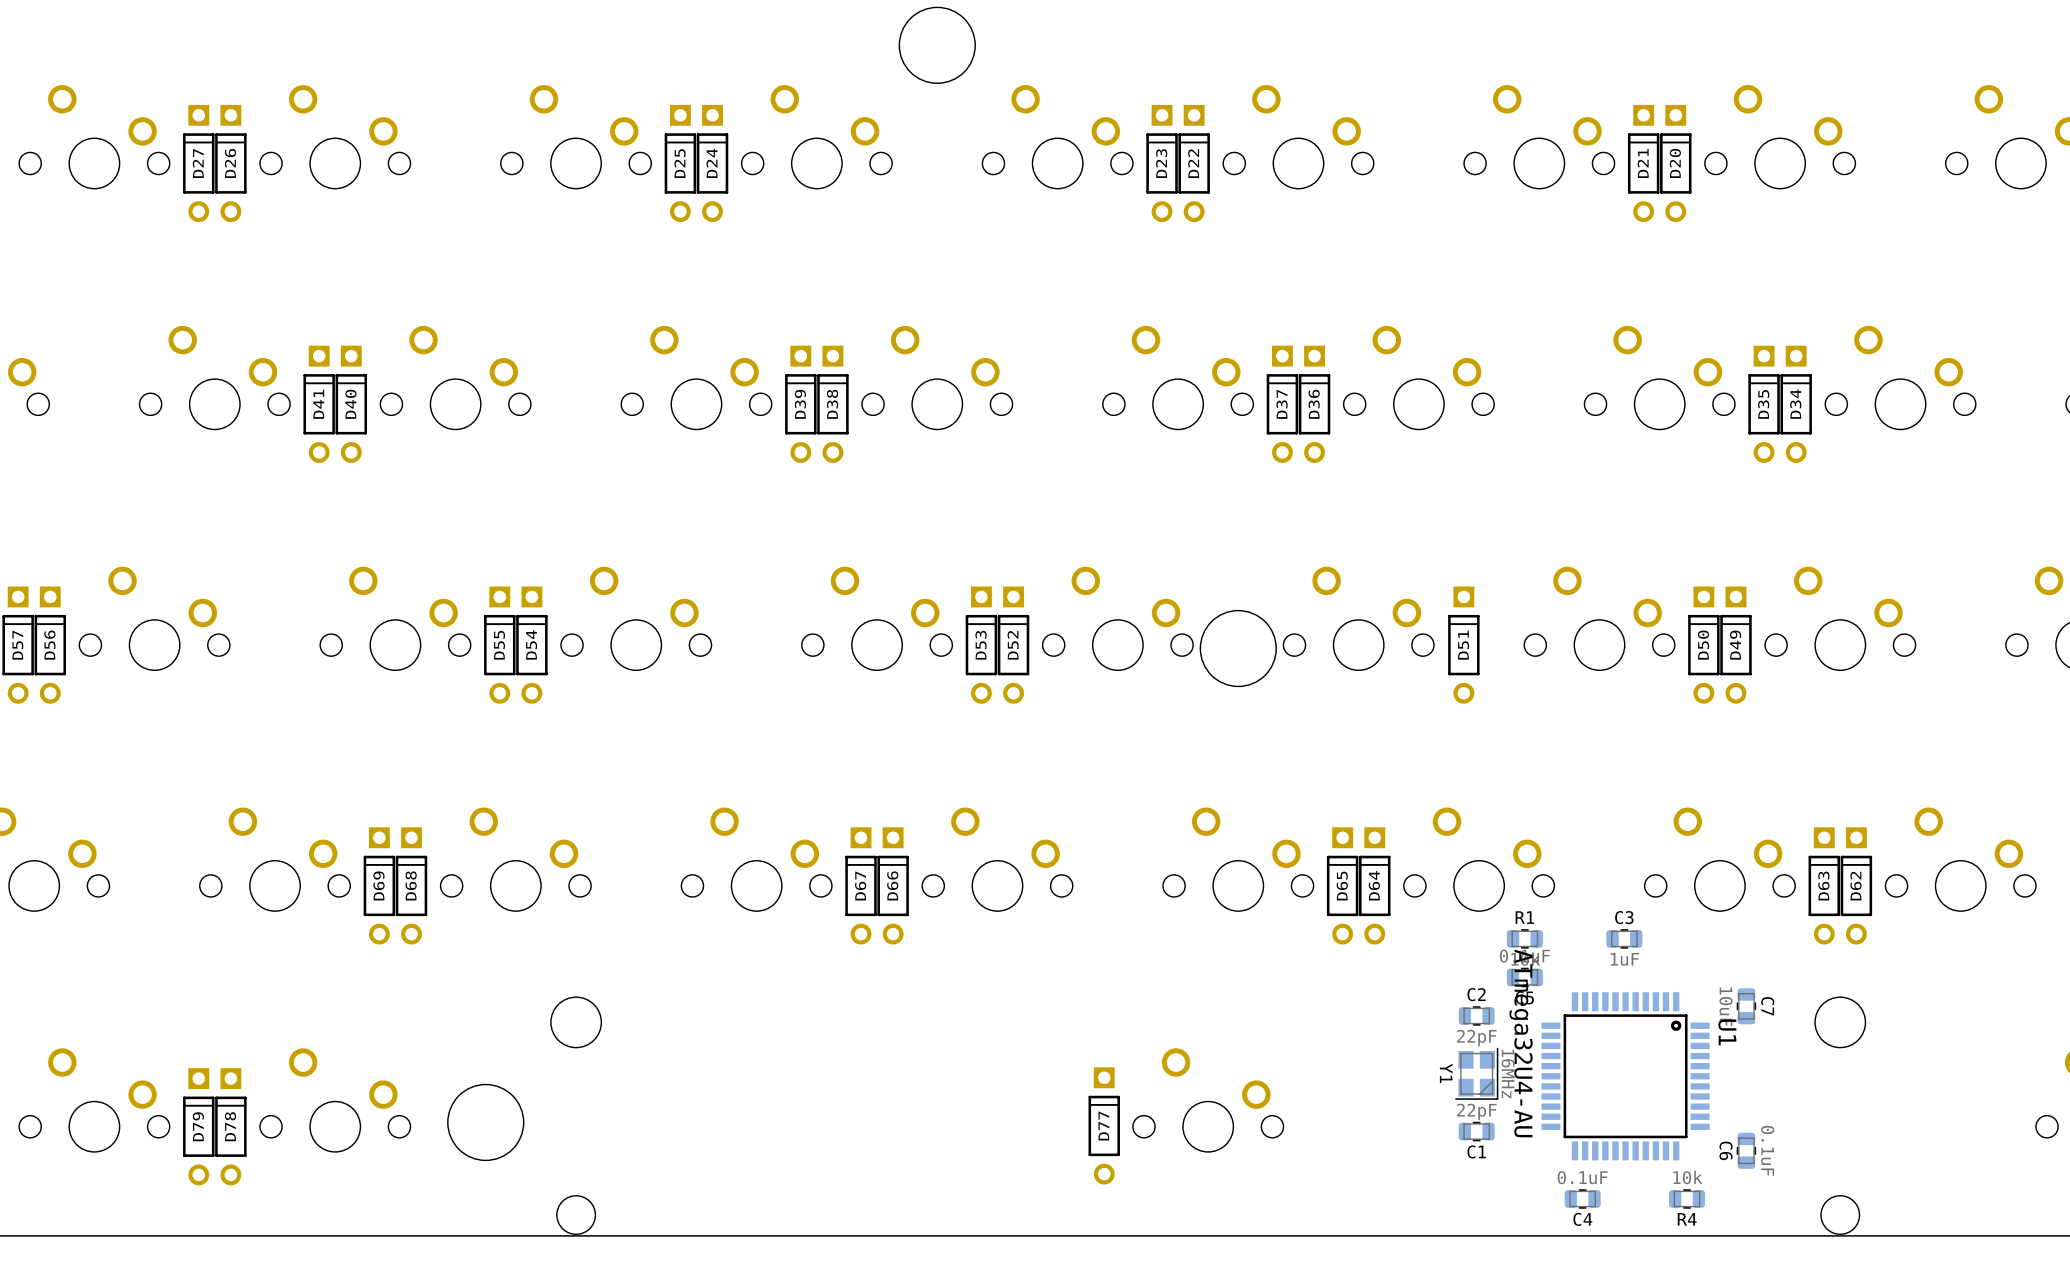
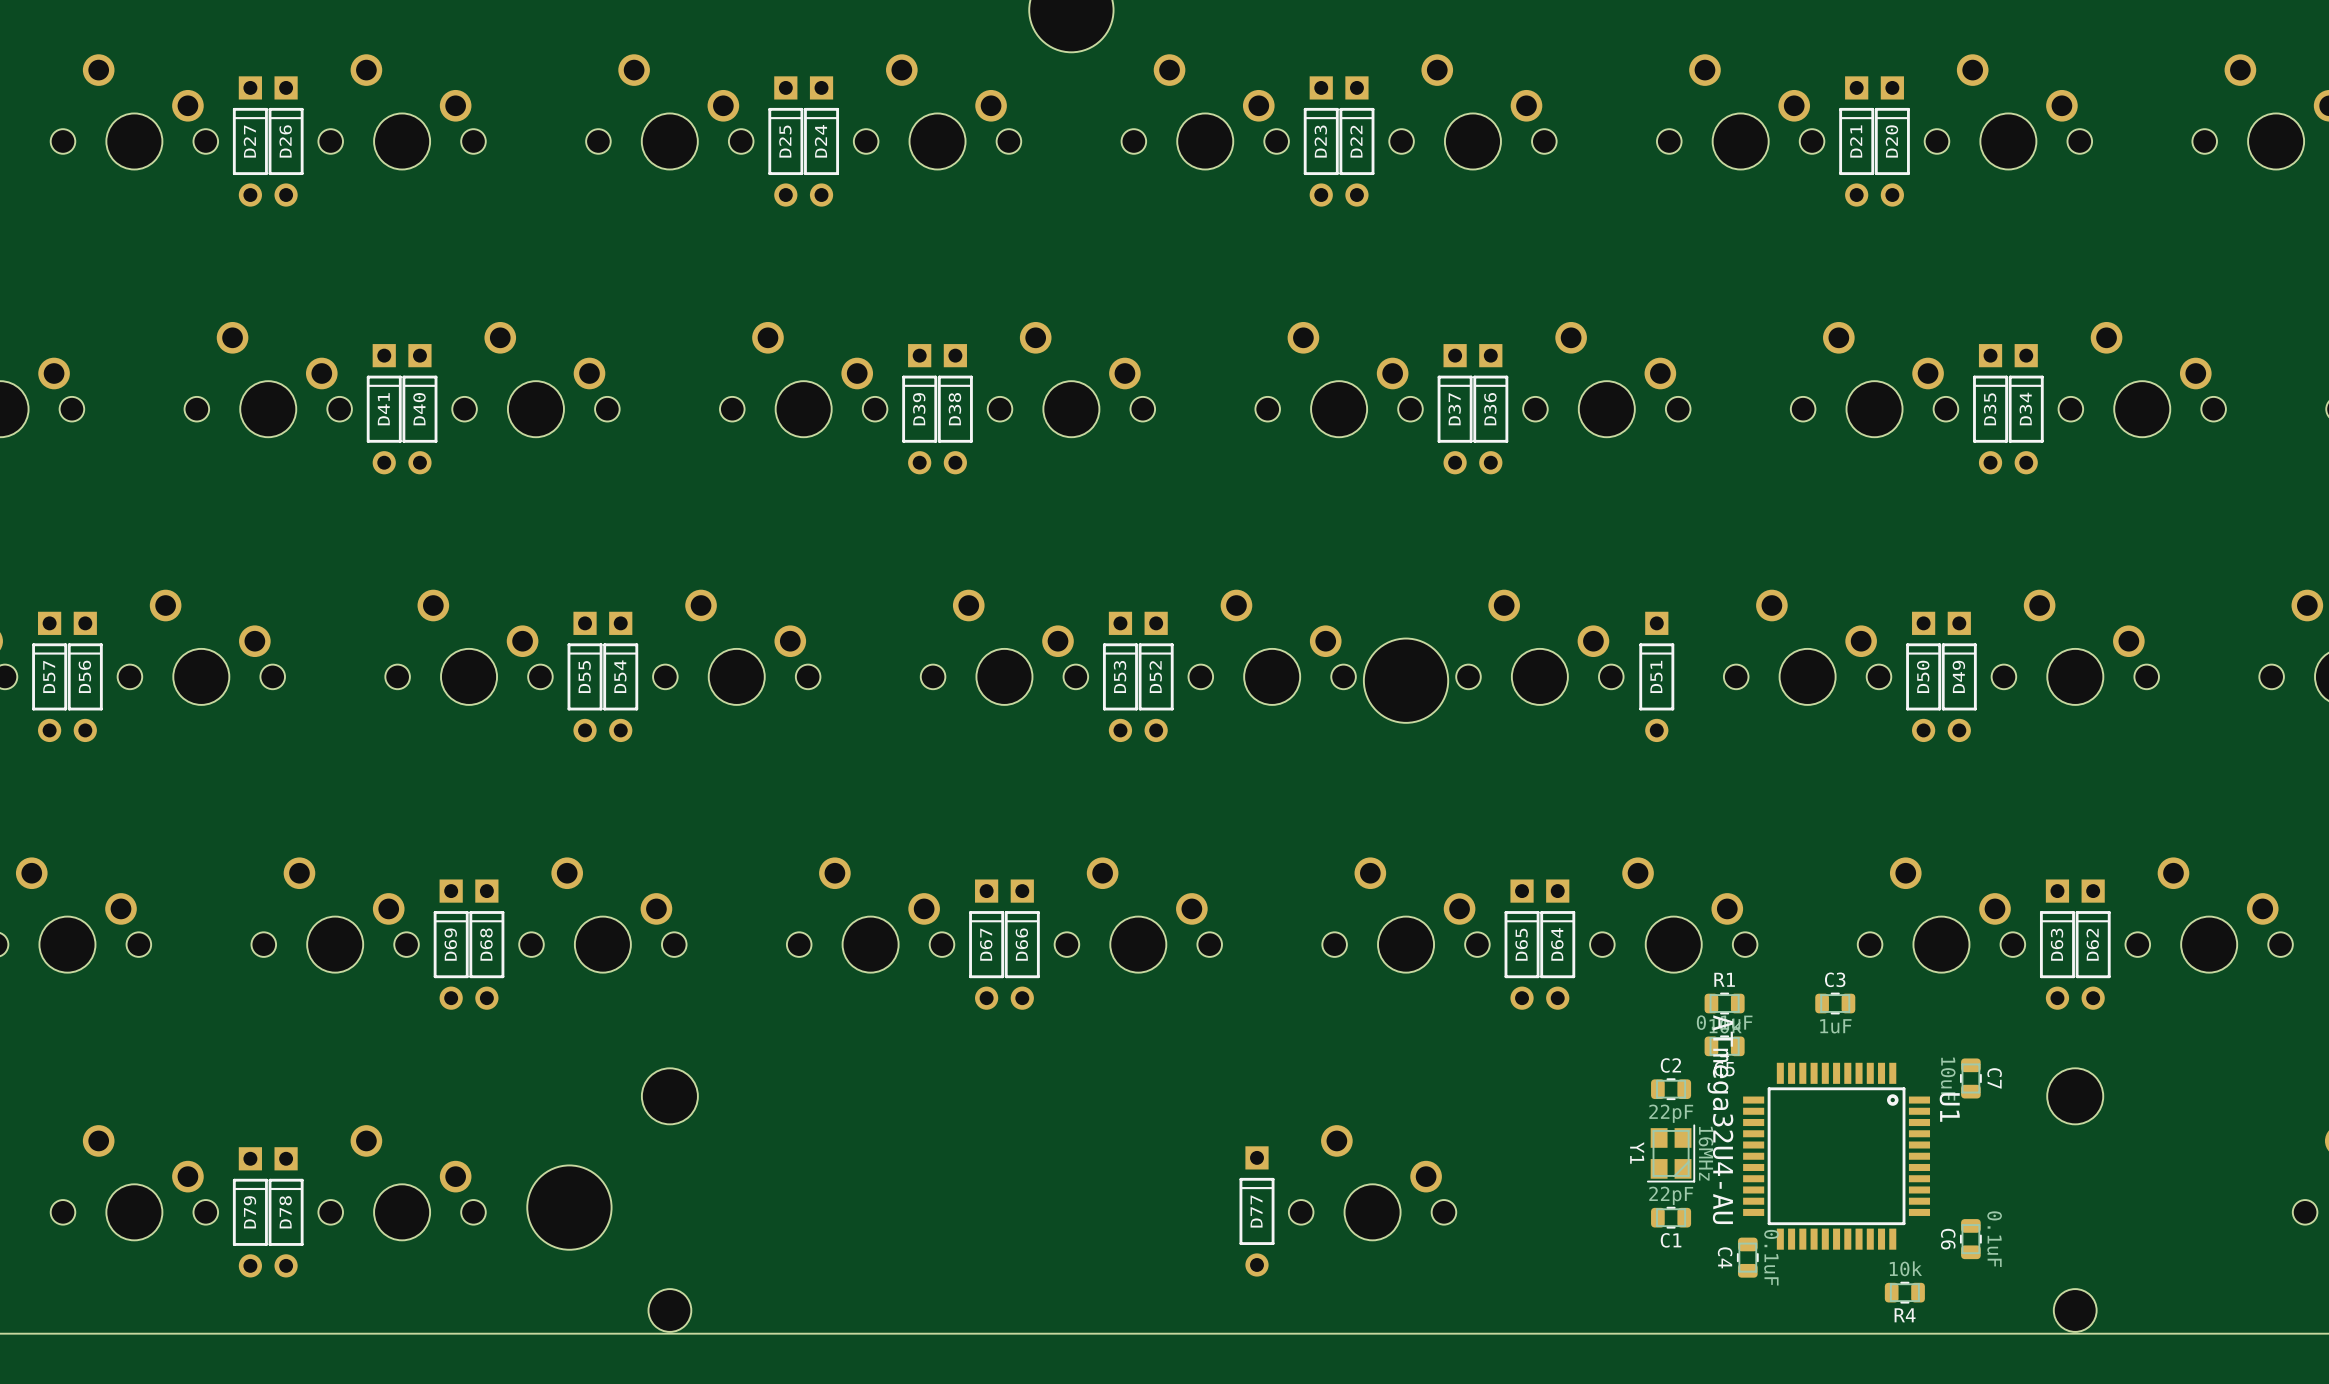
C4 rotation: 0° (1582, 1198) -> 90° clockwise (1747, 1257)
C4 position: (1582, 1198) -> (1747, 1257)

